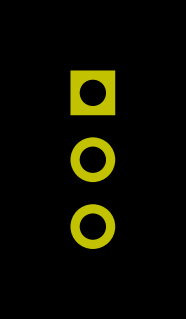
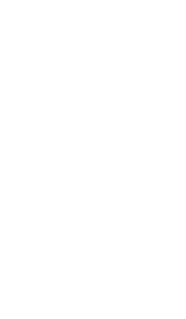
part: (92, 159) -> none

